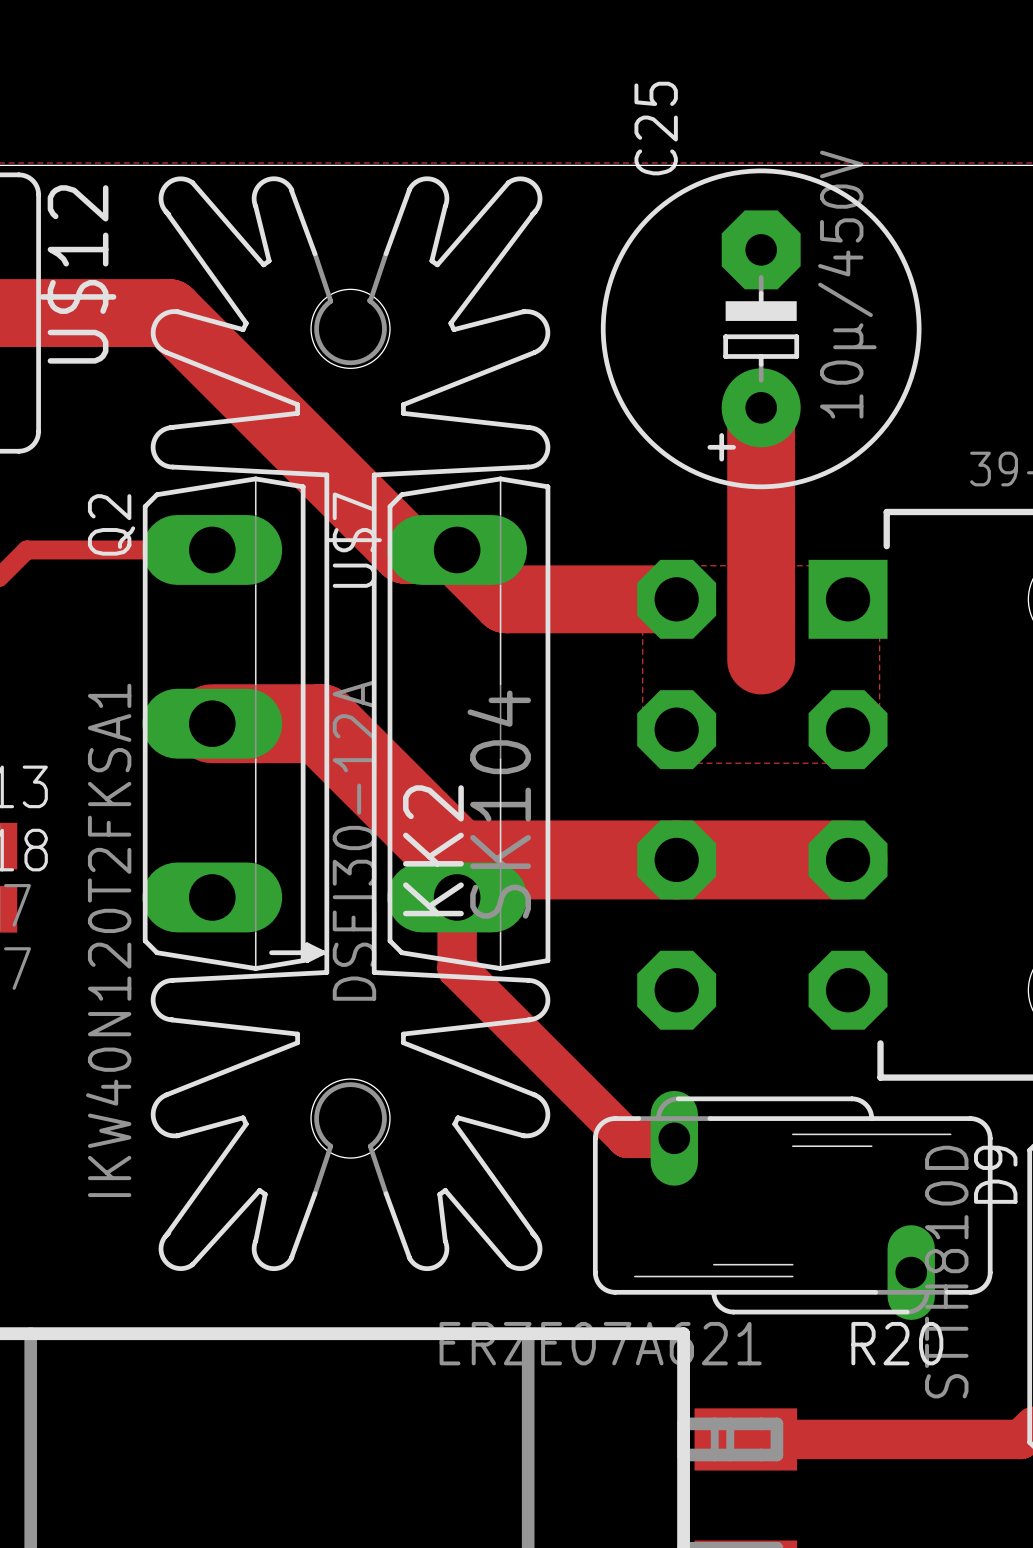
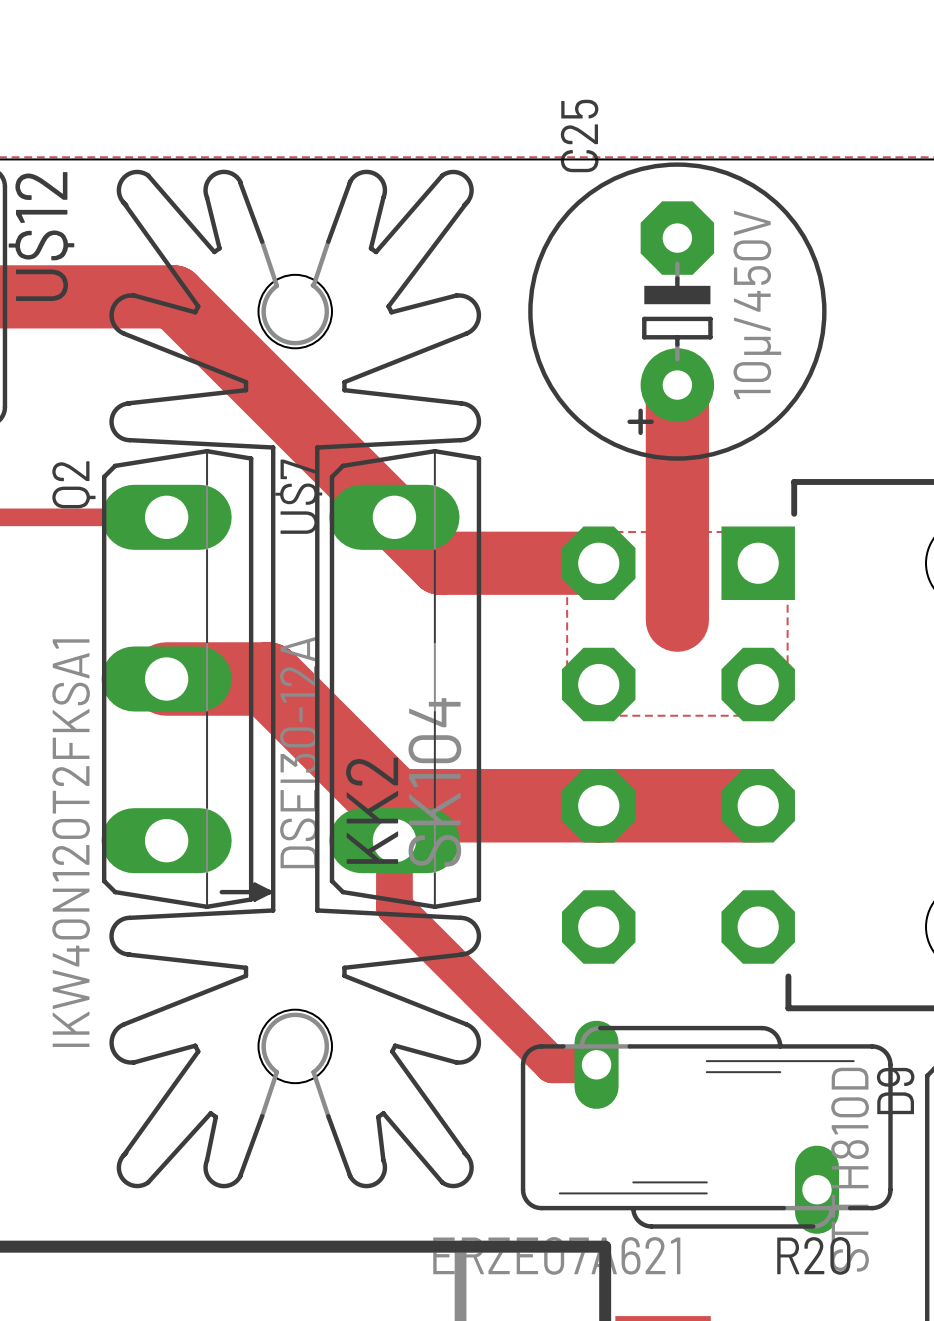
track: (168, 313) (405, 549) (457, 549) -> (126, 296) (173, 296) (394, 517)

